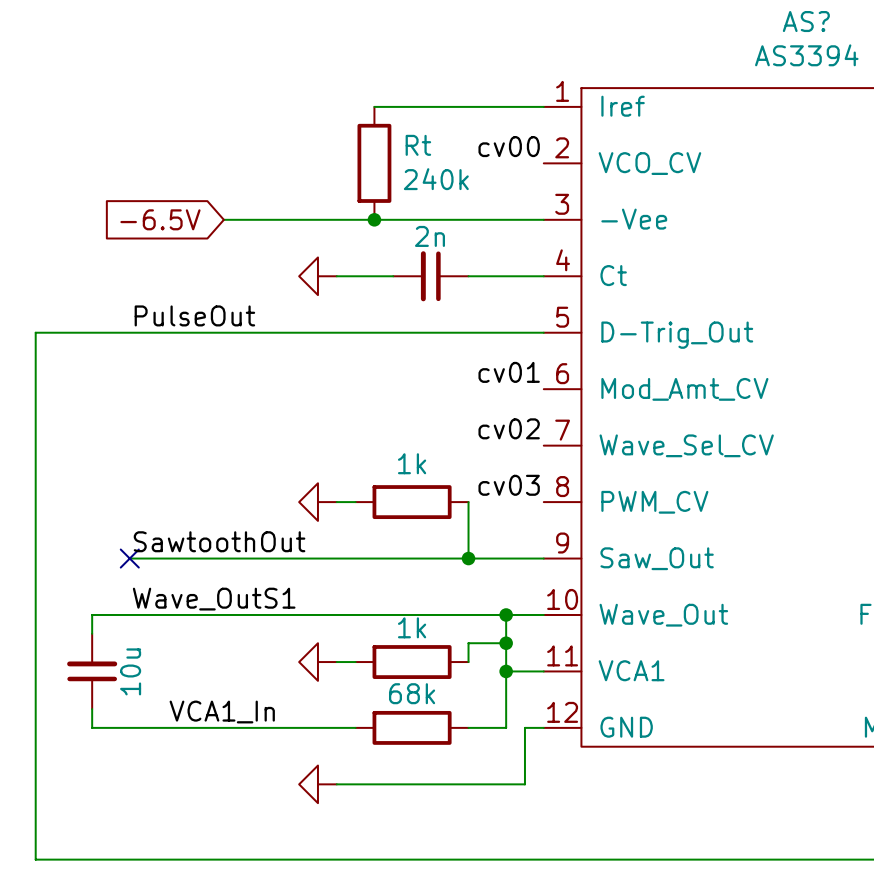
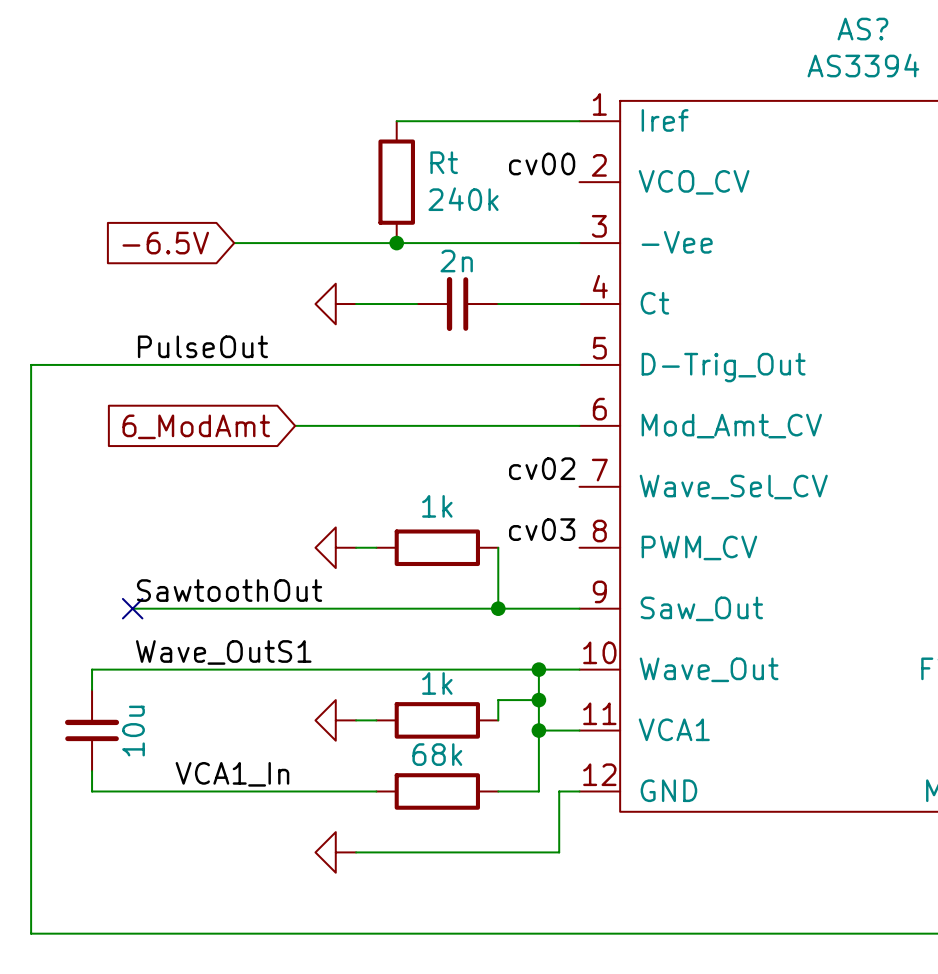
label: cv01 (509, 372) -> none
wire: none -> (295, 425) (579, 425)
global label: none -> 6_ModAmt (196, 426)

